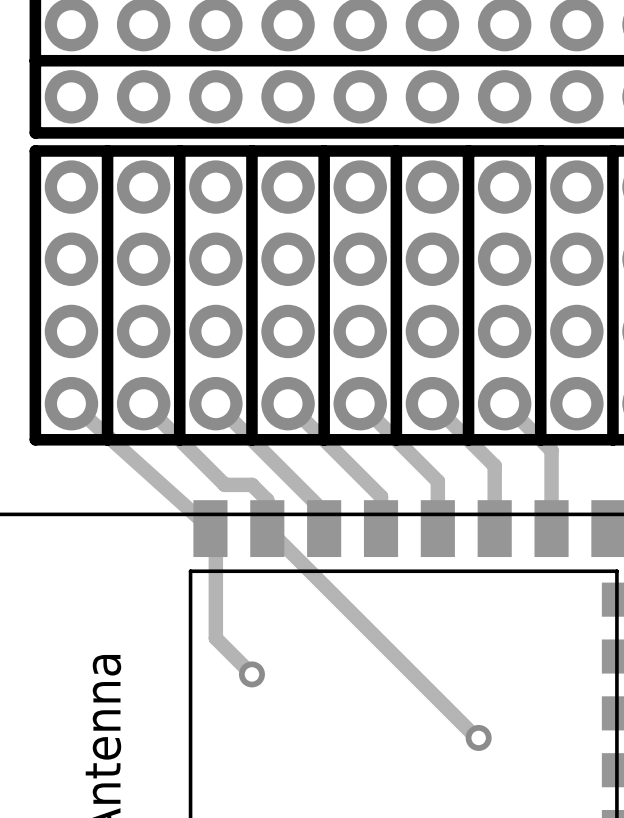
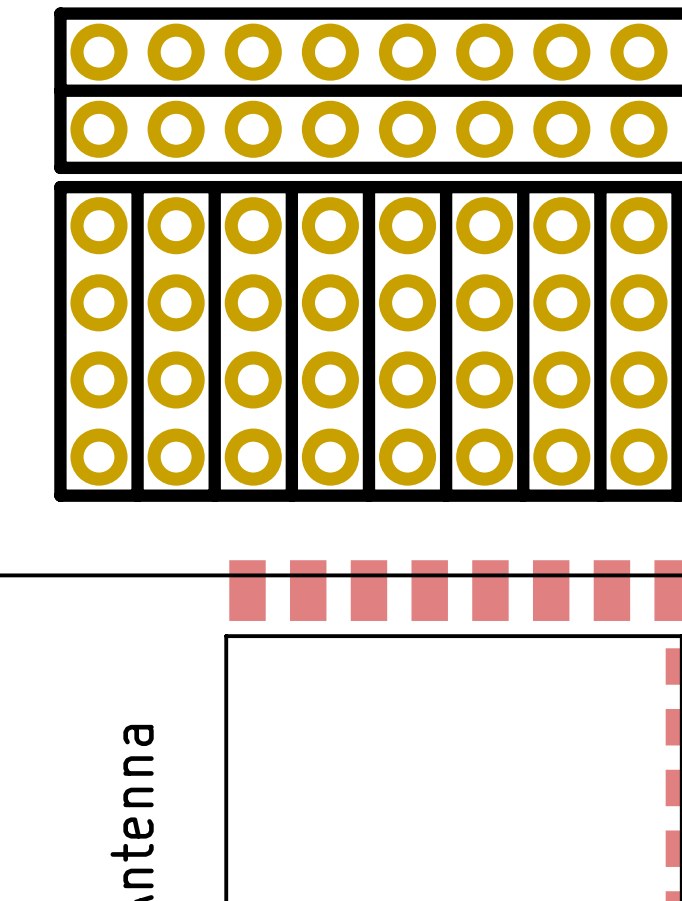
track: (71, 403) (215, 534) (215, 638) (251, 674) -> none
track: (143, 403) (224, 484) (251, 484) (267, 500) (267, 528) (478, 737) -> none
track: (215, 403) (324, 511) (324, 528) -> none
track: (288, 403) (381, 496) (381, 528) -> none
track: (360, 403) (437, 481) (437, 528) -> none
track: (432, 403) (494, 465) (494, 528) -> none
track: (504, 403) (551, 450) (551, 528) -> none
via: (251, 674) -> none
via: (478, 737) -> none

